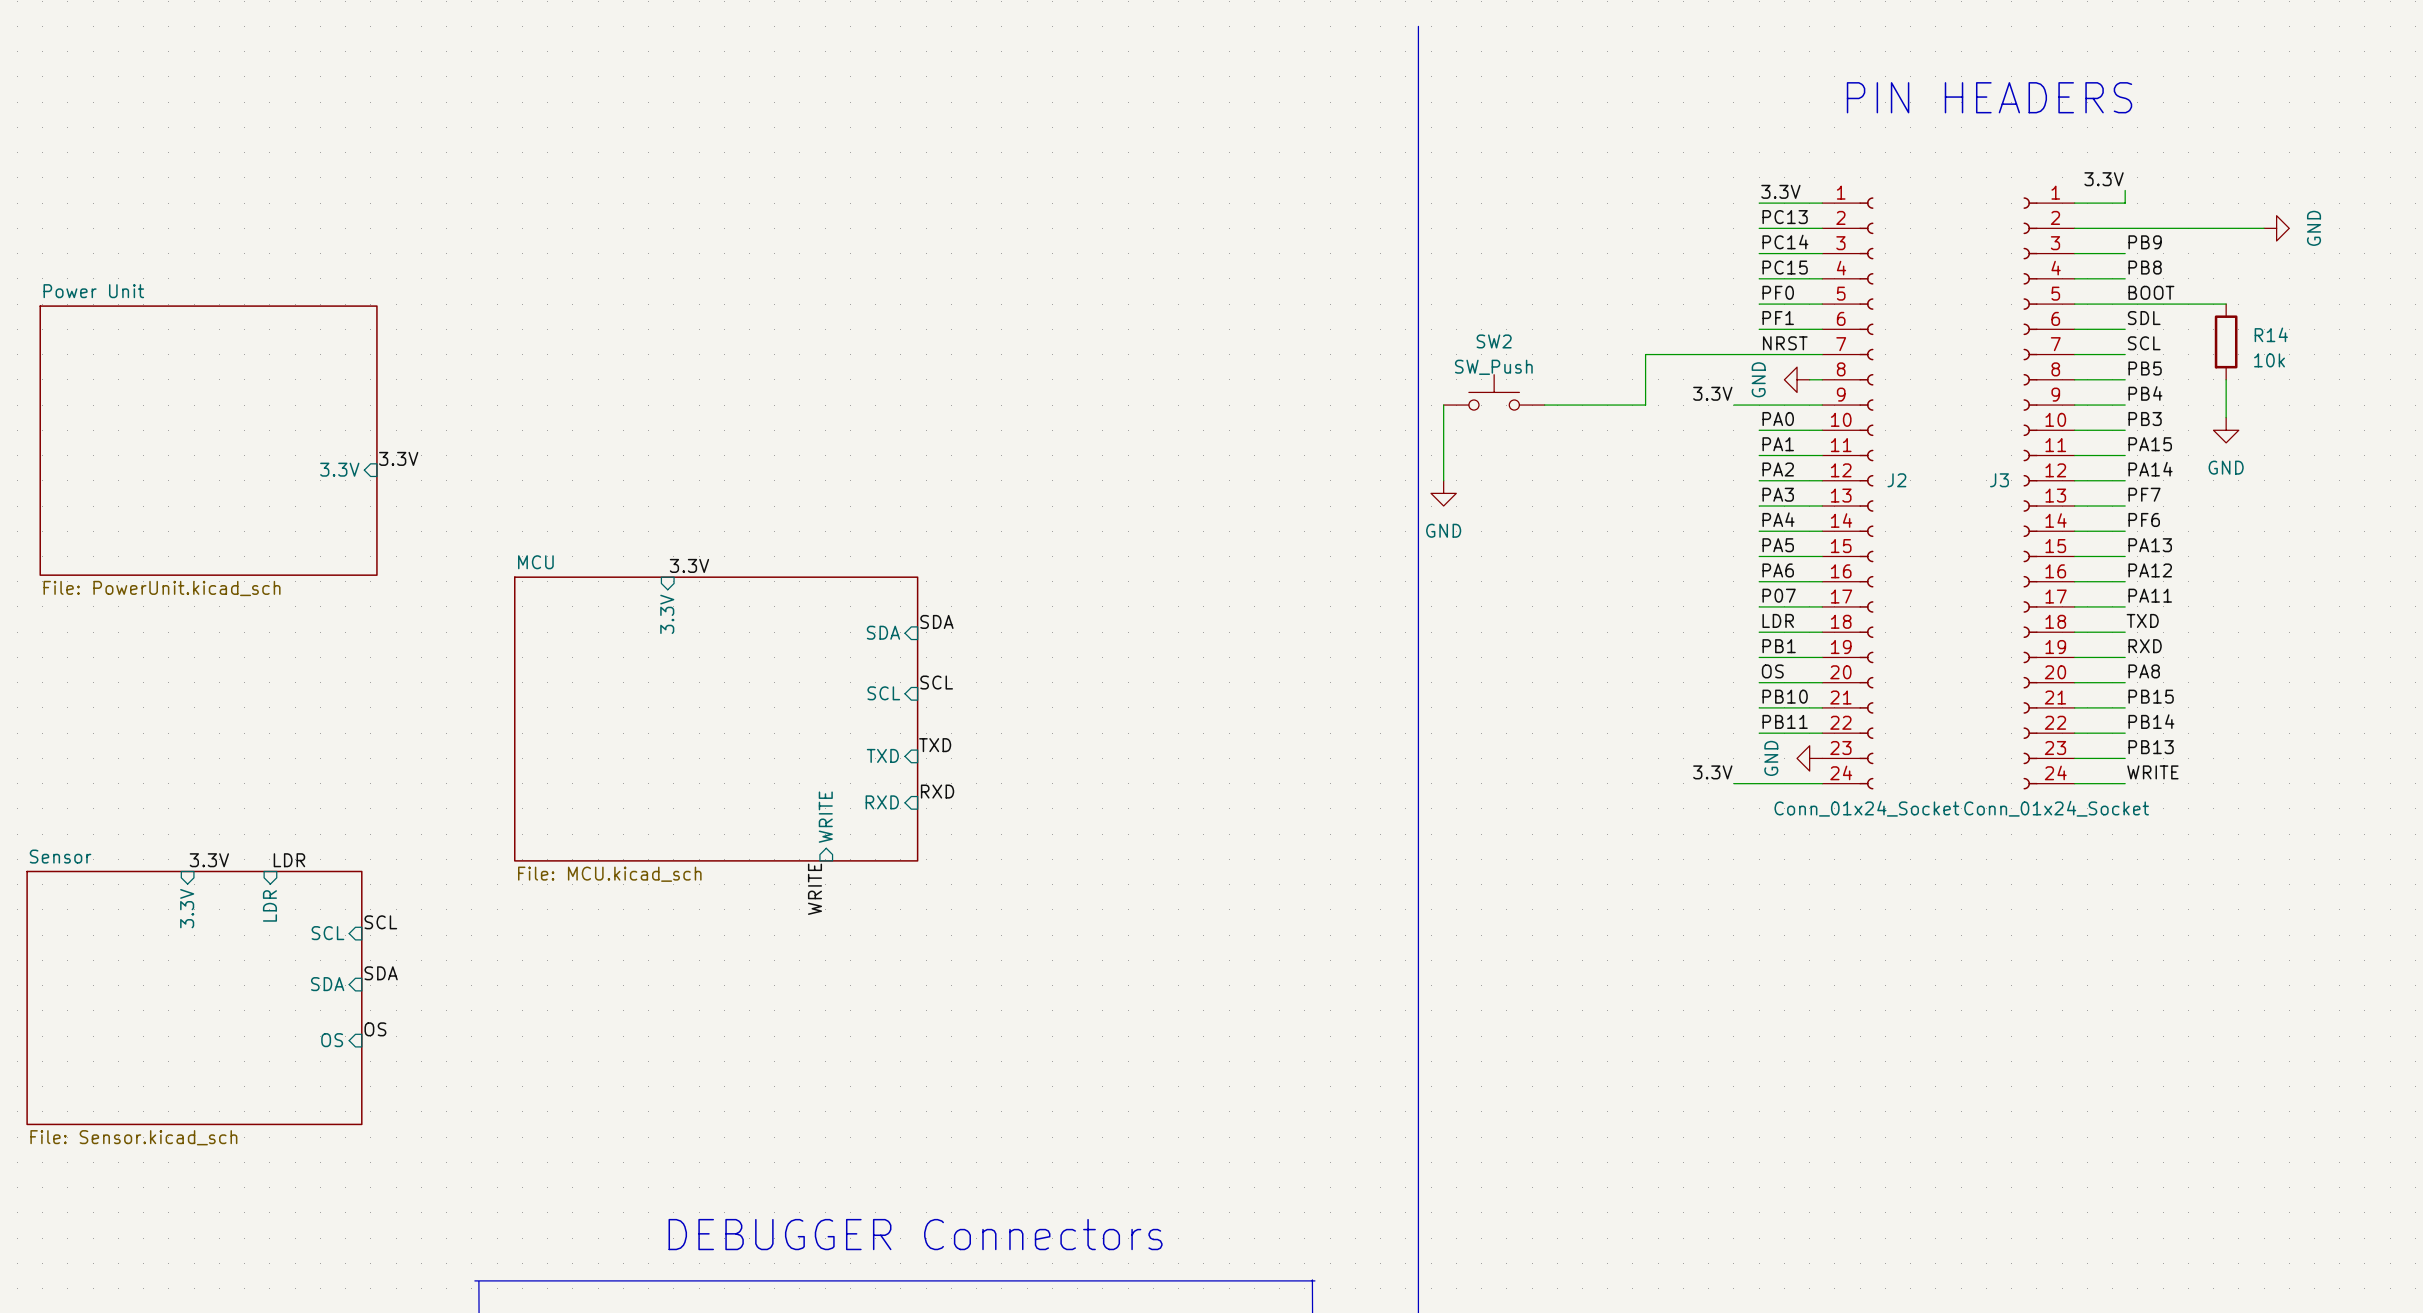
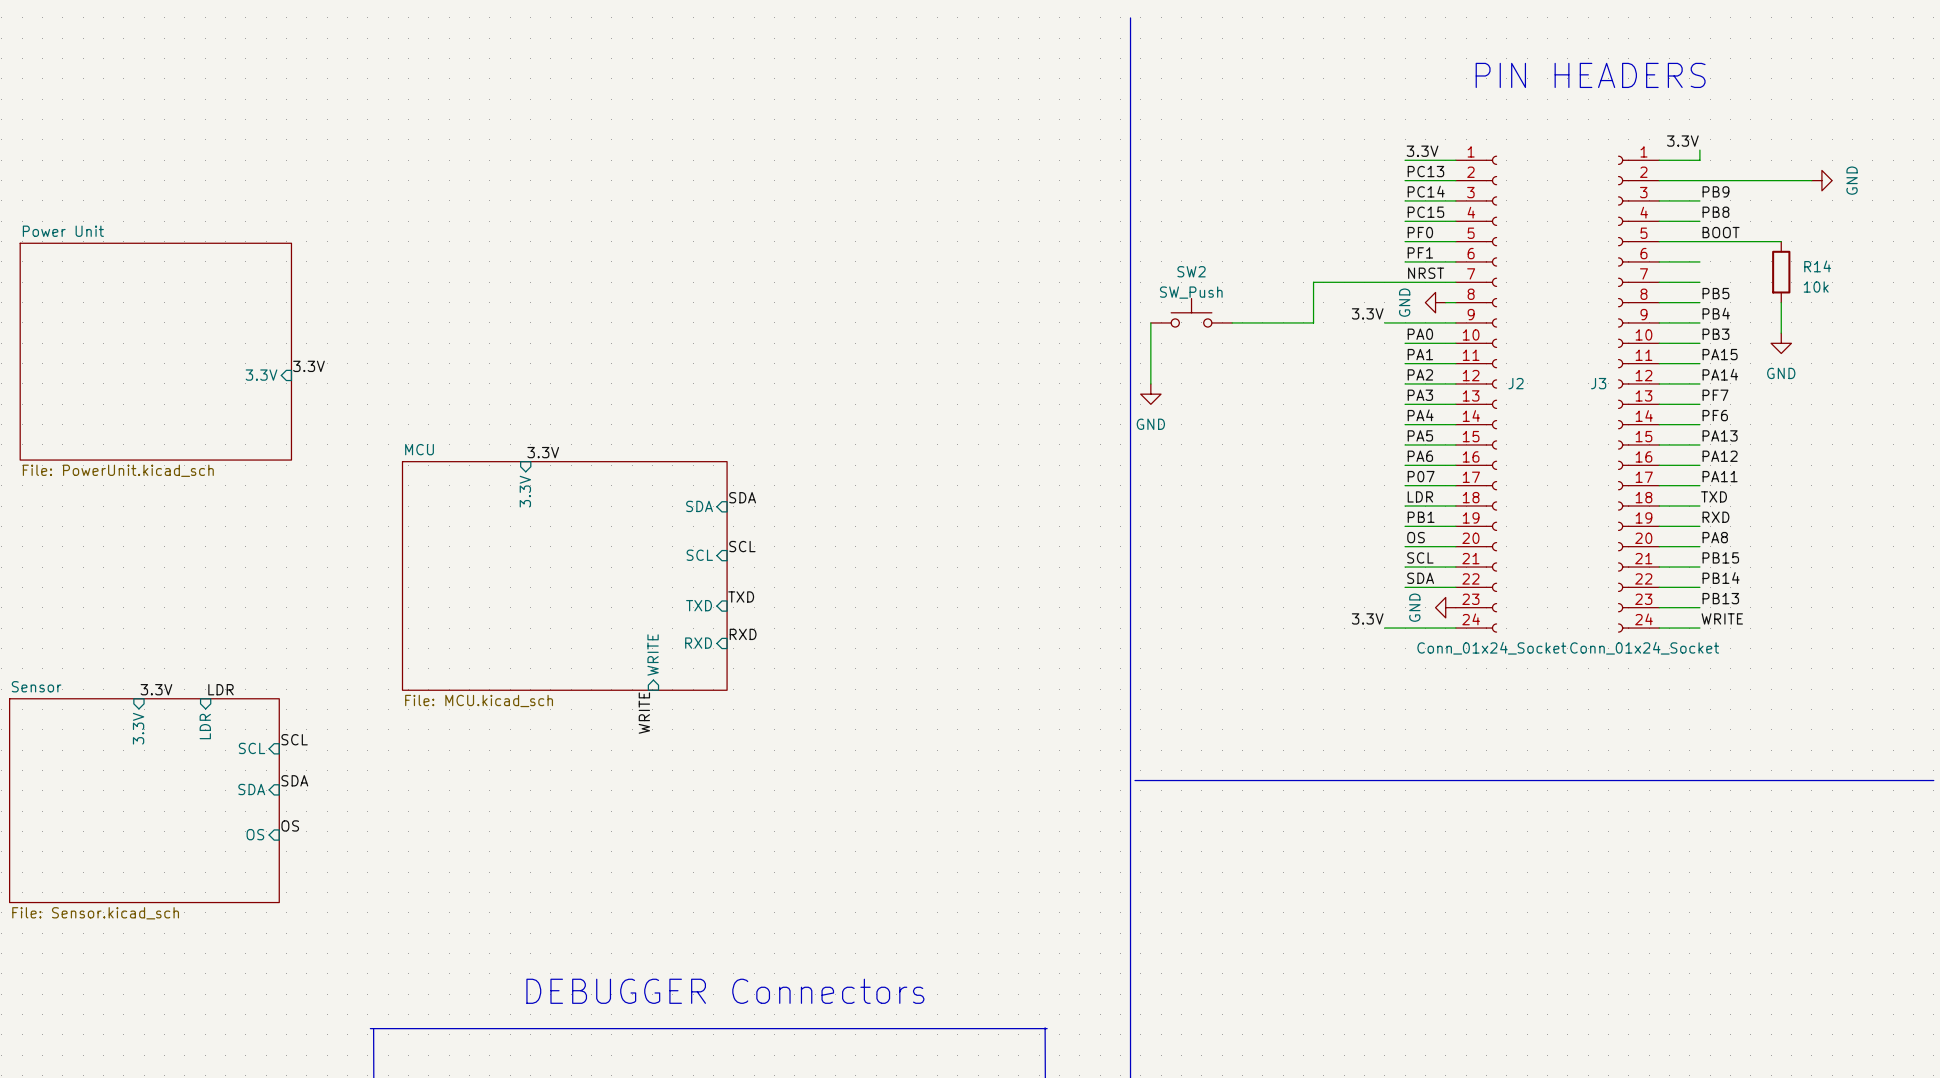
label: SDL (2144, 318) -> none
label: SCL (2144, 343) -> none
label: PB10 (1785, 696) -> SCL (1420, 557)
label: PB11 (1785, 721) -> SDA (1420, 578)
line: none -> (1134, 780) (1933, 780)

